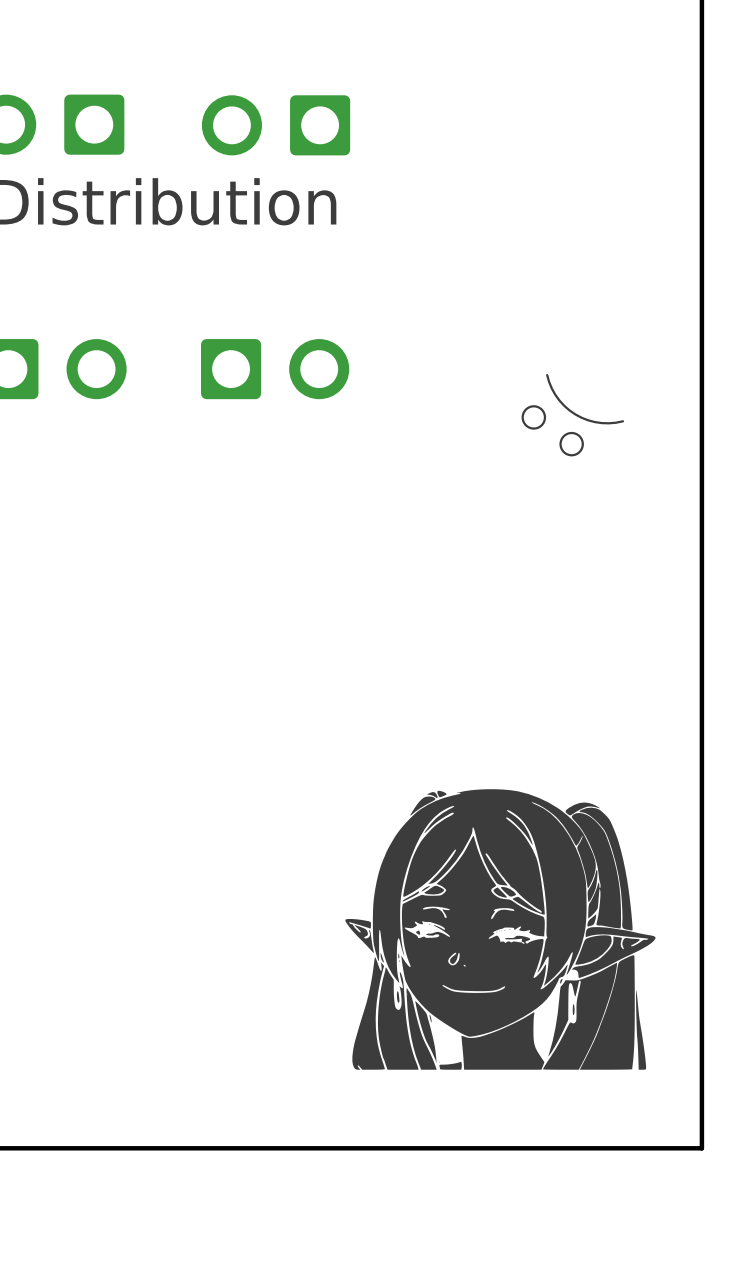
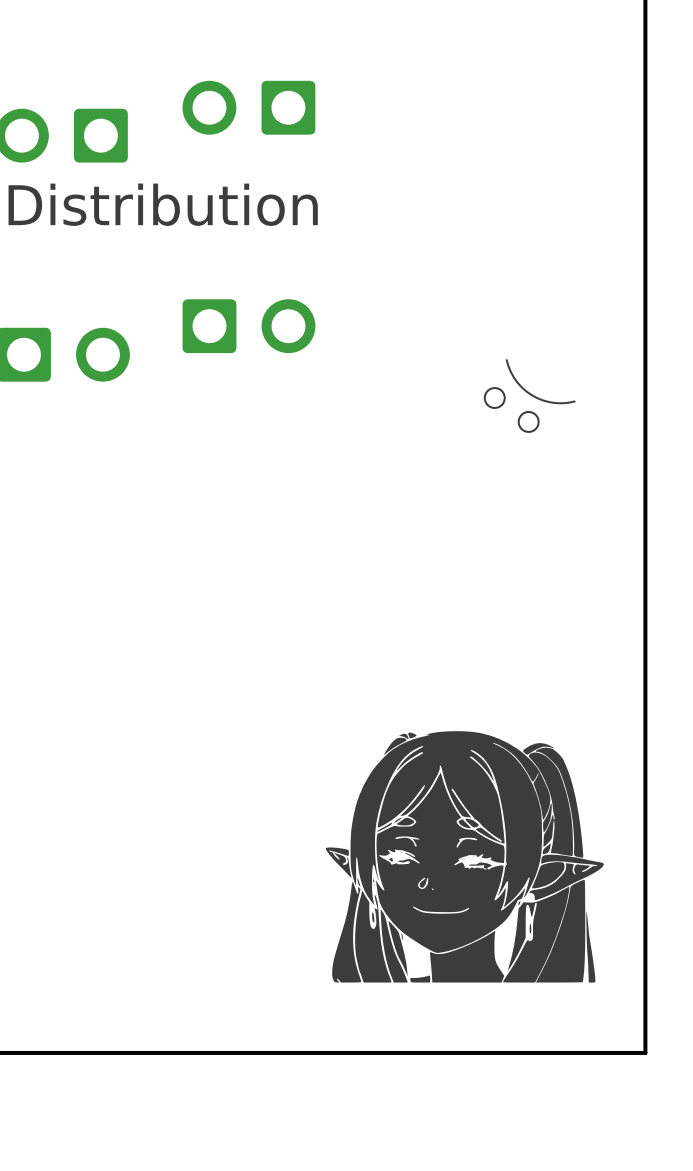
part position: (276, 125) -> (248, 107)
part position: (275, 369) -> (248, 326)

